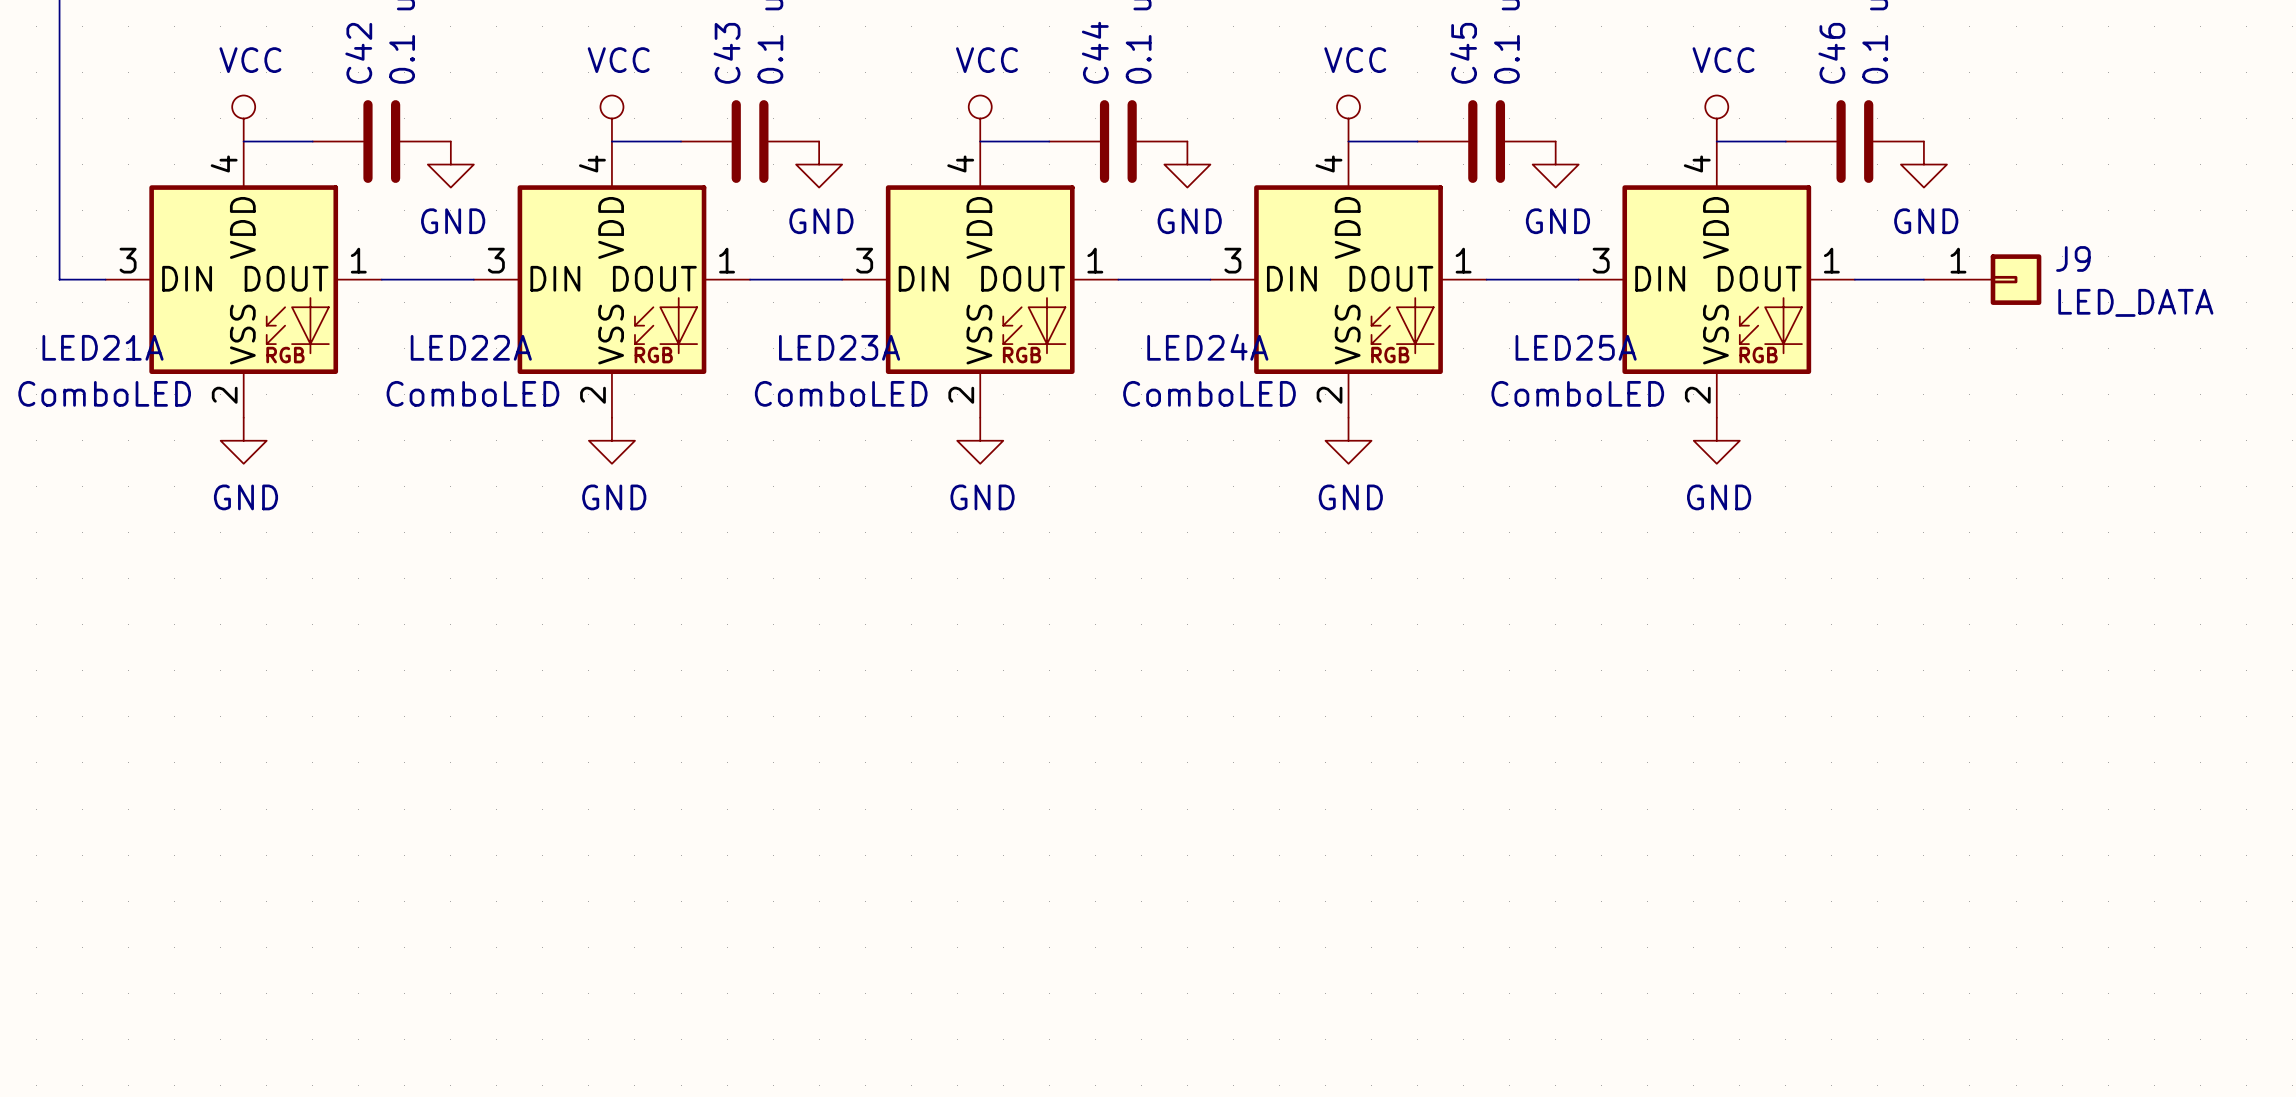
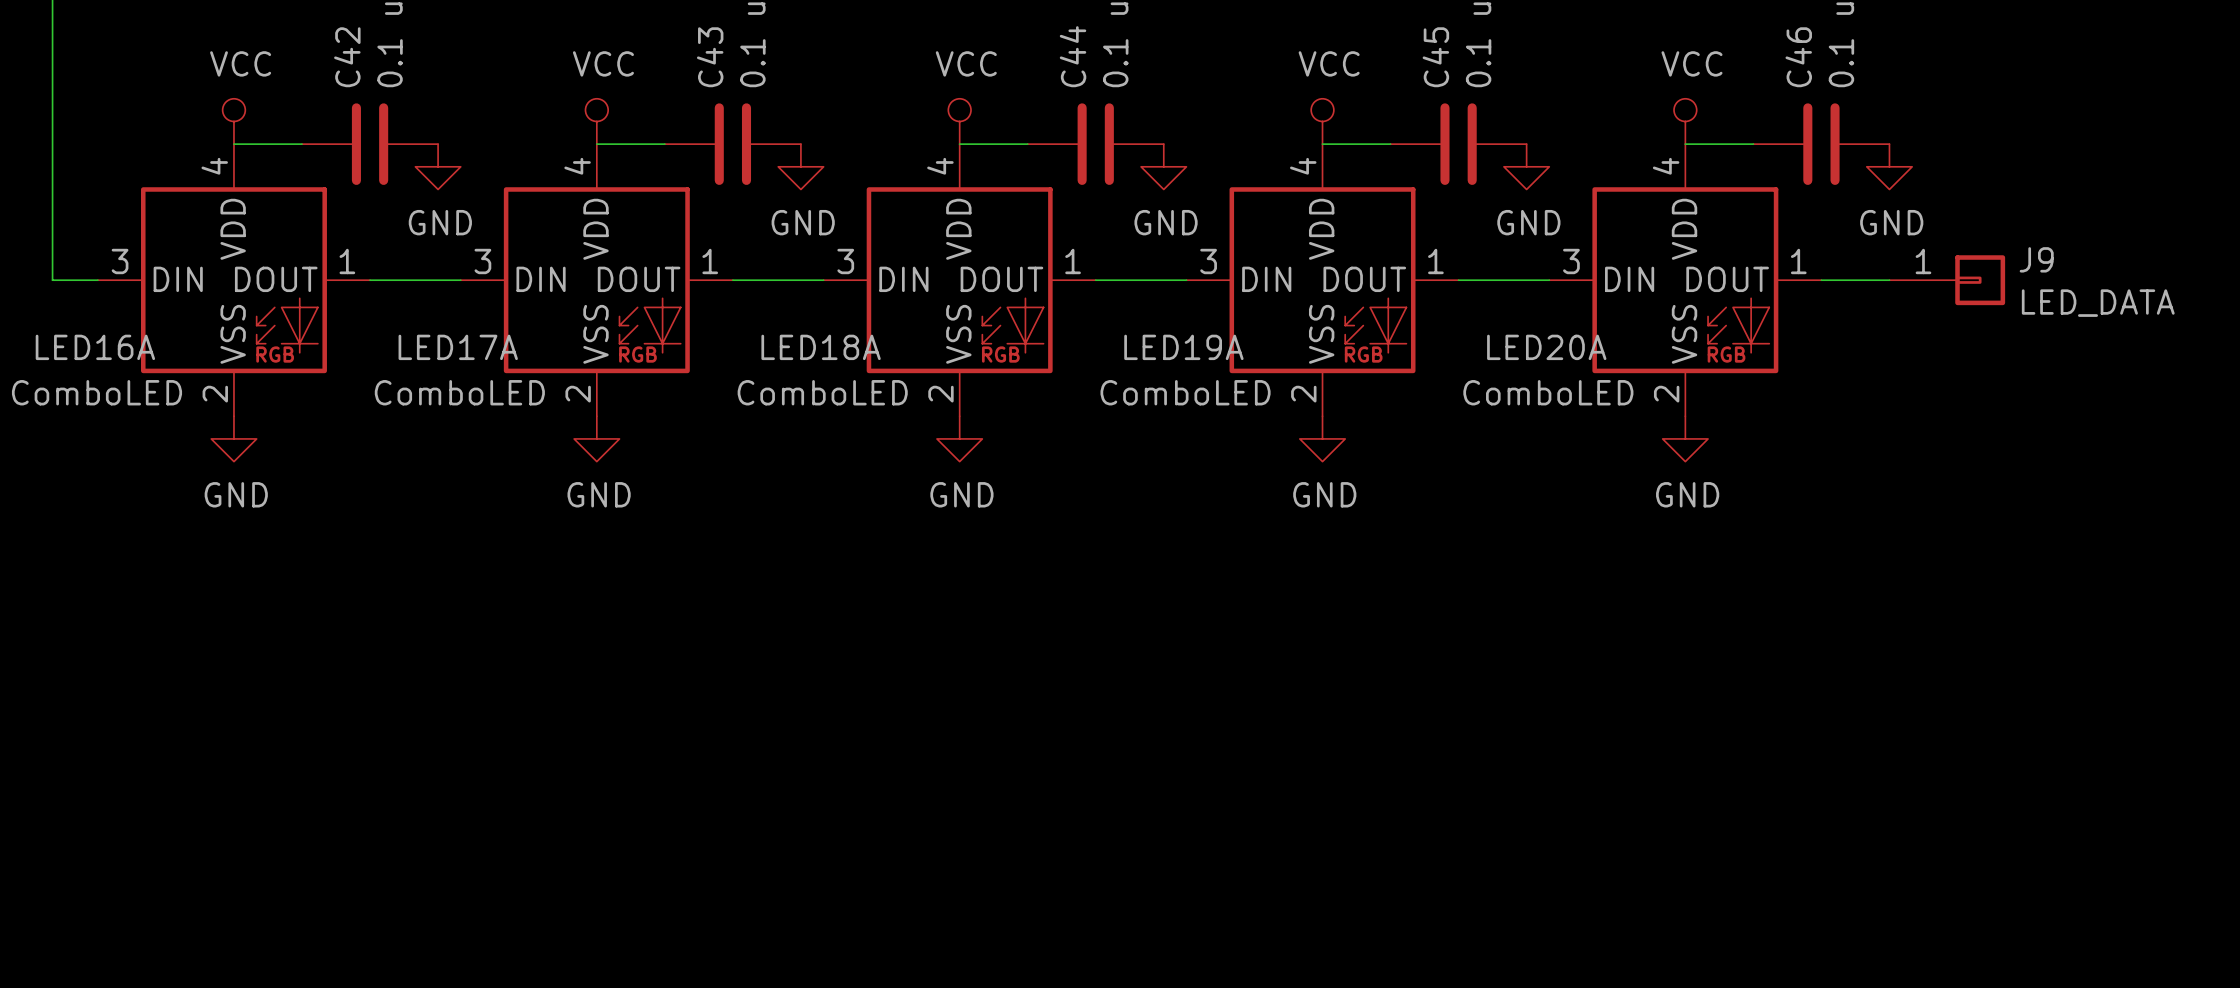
LED21A name: LED21A (103, 347) -> LED16A (95, 347)
LED22A name: LED22A (471, 347) -> LED17A (458, 347)
LED23A name: LED23A (839, 347) -> LED18A (821, 347)
LED24A name: LED24A (1207, 347) -> LED19A (1183, 347)
LED25A name: LED25A (1576, 347) -> LED20A (1546, 347)

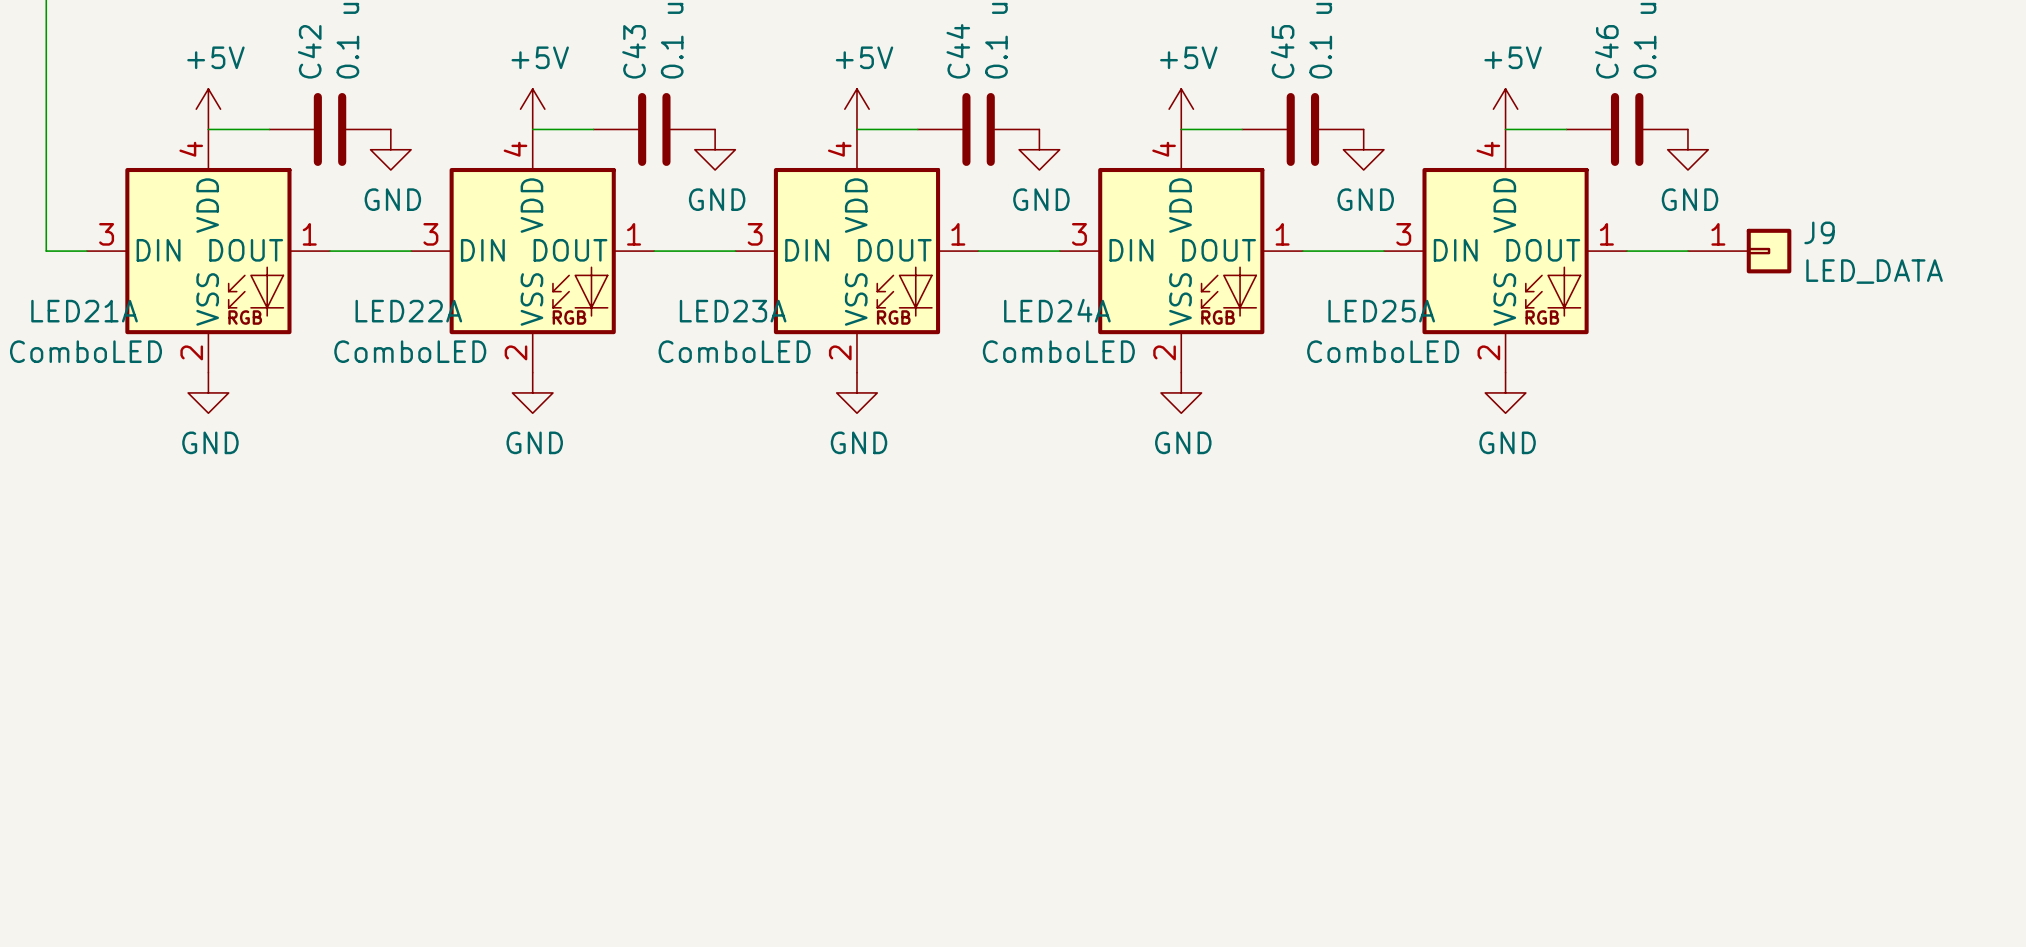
power symbol: VCC (233, 121) -> +5V (208, 109)
power symbol: VCC (596, 121) -> +5V (532, 109)
power symbol: VCC (959, 121) -> +5V (856, 109)
power symbol: VCC (1322, 121) -> +5V (1181, 109)
power symbol: VCC (1685, 121) -> +5V (1505, 109)
LED16A name: LED16A (95, 347) -> LED21A (84, 311)
LED17A name: LED17A (458, 347) -> LED22A (408, 311)
LED18A name: LED18A (821, 347) -> LED23A (733, 311)
LED19A name: LED19A (1183, 347) -> LED24A (1057, 310)
LED20A name: LED20A (1546, 347) -> LED25A (1381, 311)

